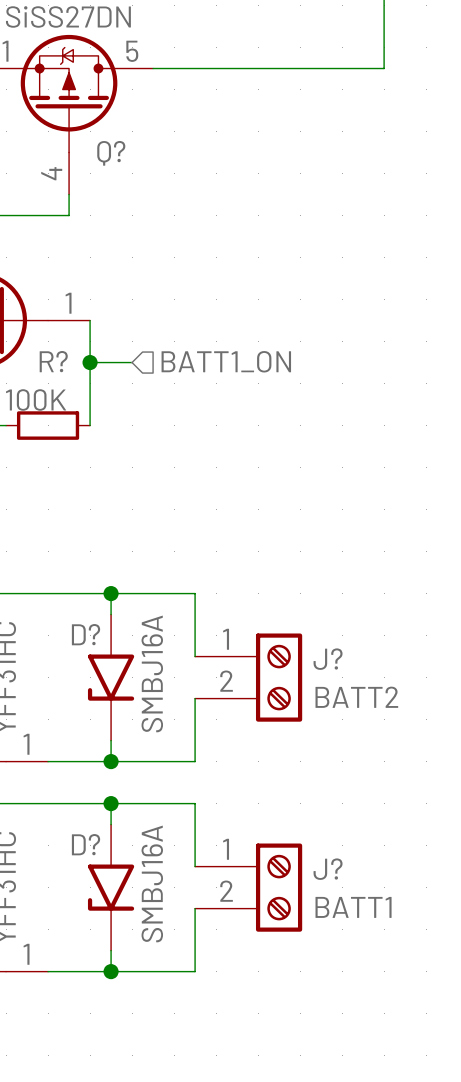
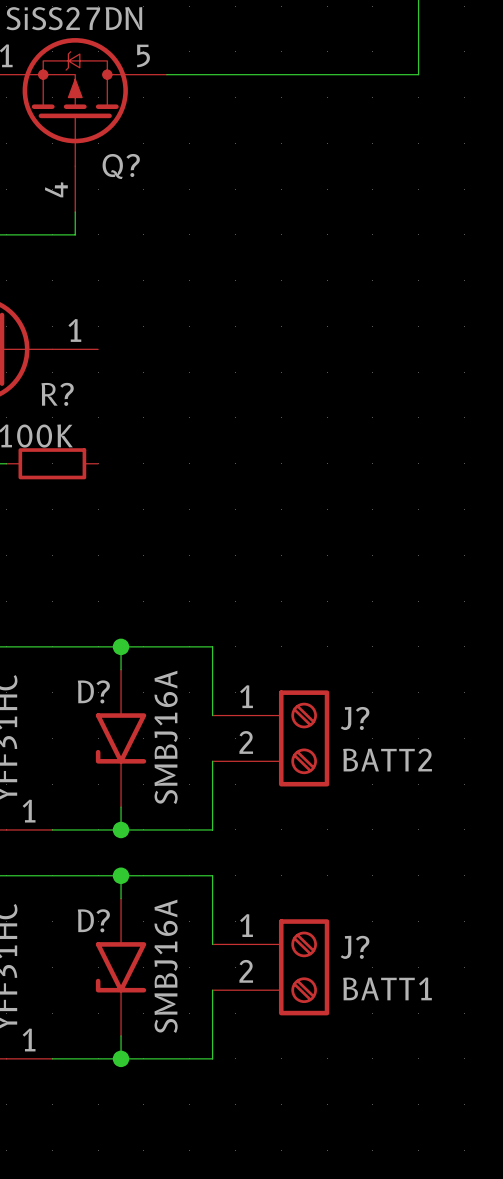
wire: (90, 320) (90, 425) -> none
hierarchical label: BATT1_ON (226, 361) -> none
wire: (90, 362) (132, 362) -> none
junction: (90, 362) -> none

